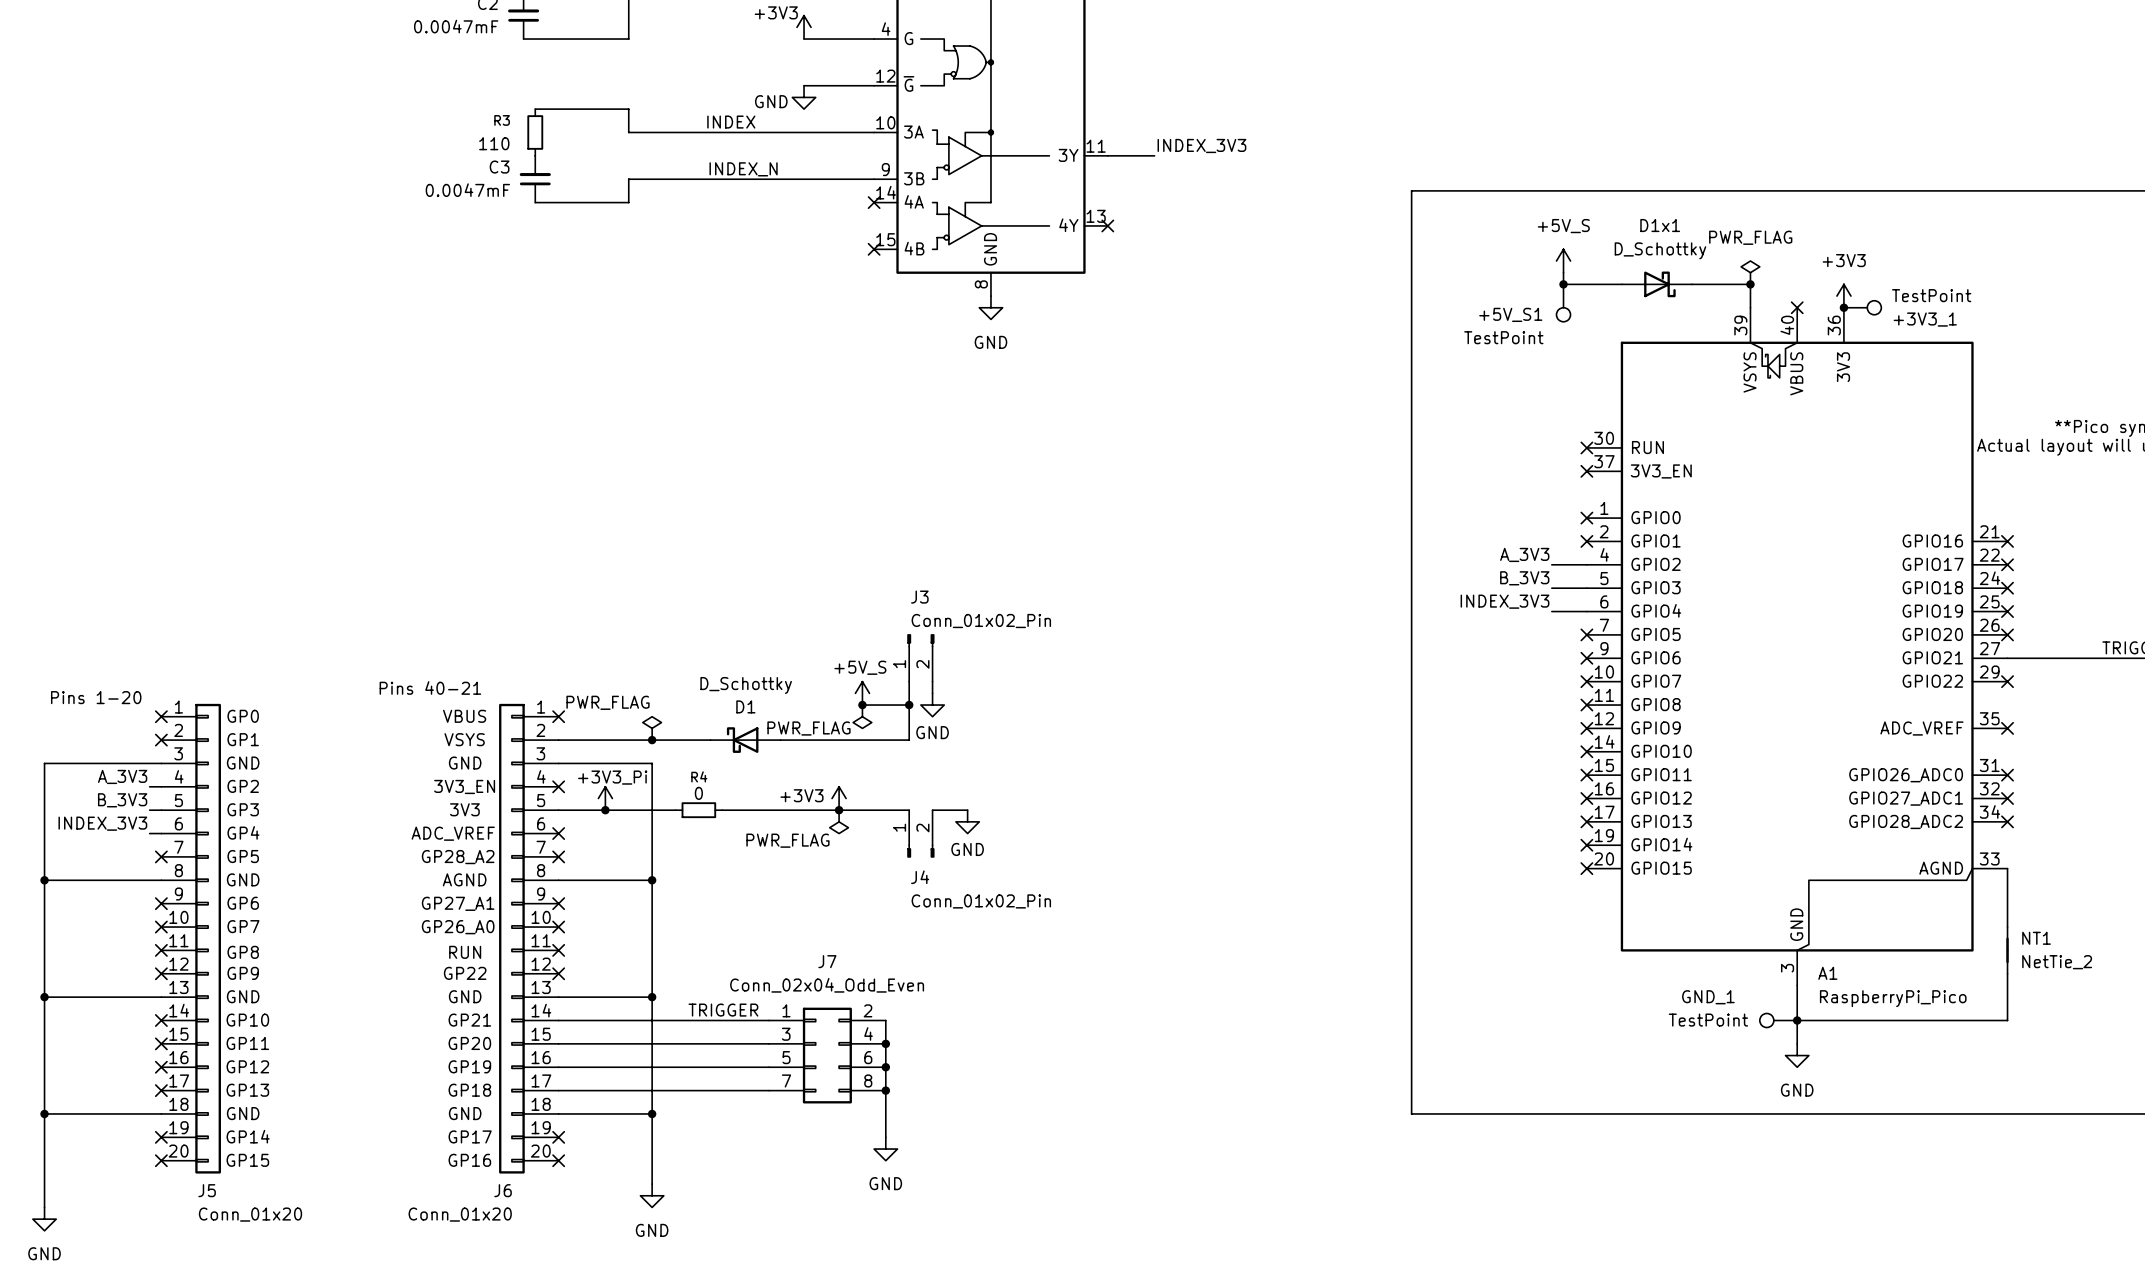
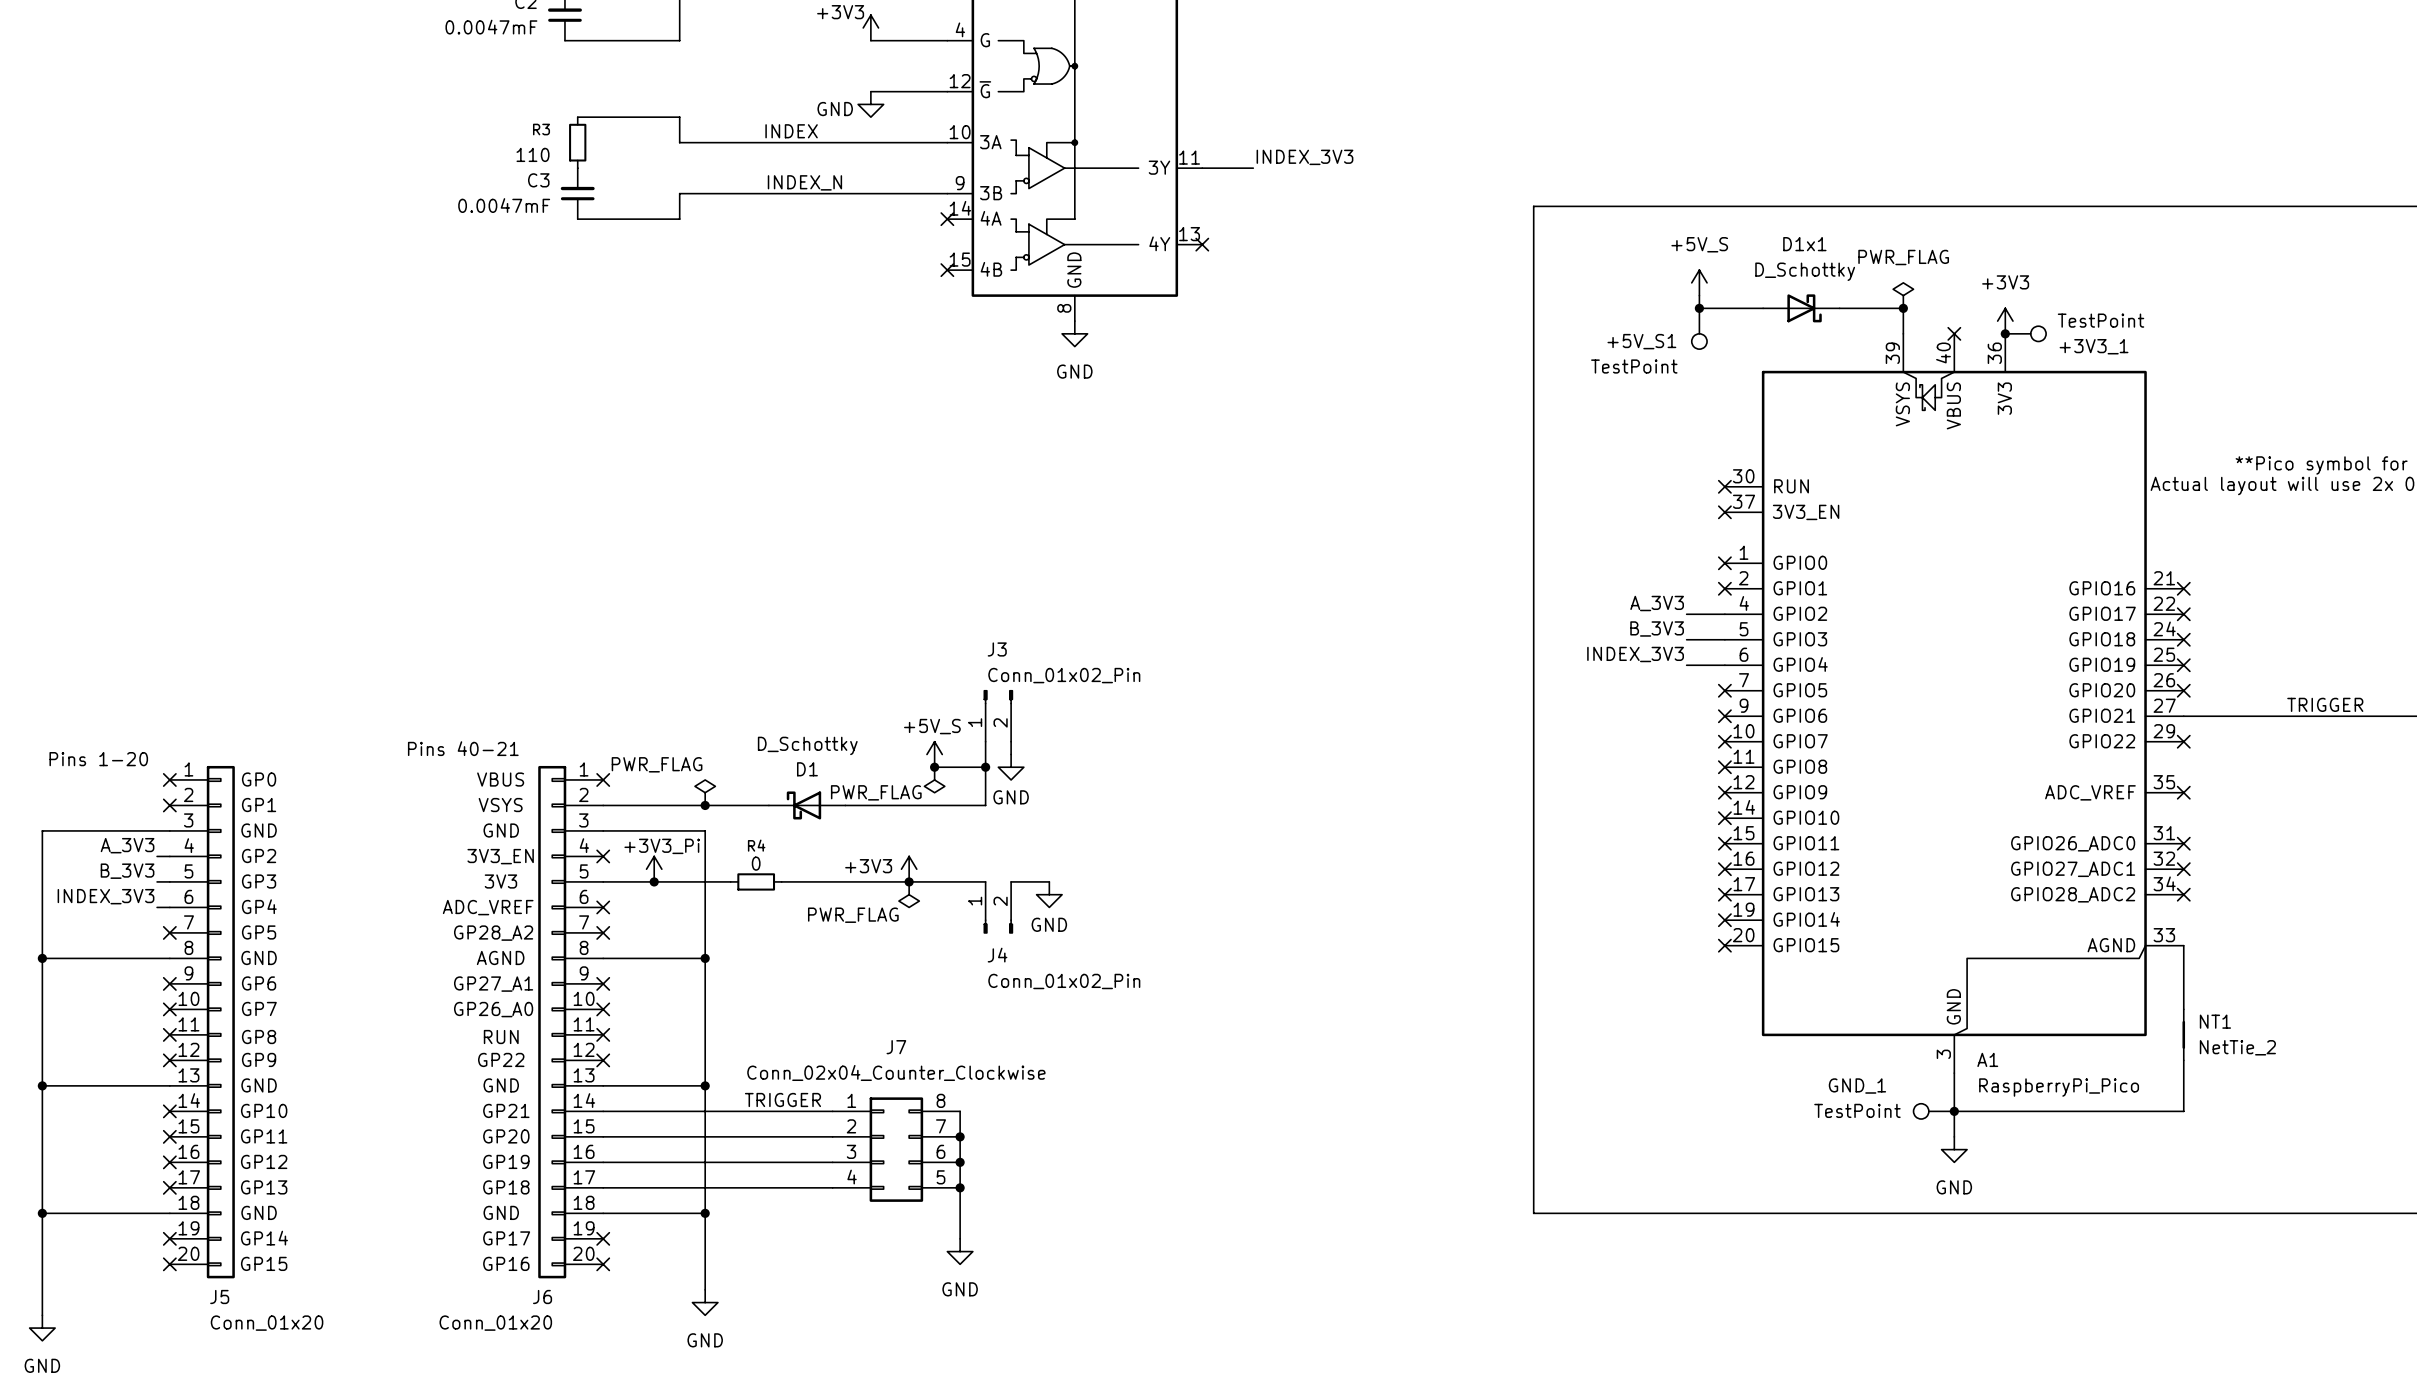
J7 value: Conn_02x04_Odd_Even (827, 985) -> Conn_02x04_Counter_Clockwise (896, 1072)
J7 pin number: 2 (868, 1010) -> 8 (940, 1100)
J7 pin number: 4 (868, 1033) -> 7 (940, 1126)
J7 pin number: 3 (786, 1034) -> 2 (851, 1126)
J7 pin number: 5 (786, 1057) -> 3 (851, 1151)
J7 pin number: 7 (786, 1080) -> 4 (852, 1177)
J7 pin number: 8 (868, 1080) -> 5 (940, 1177)

